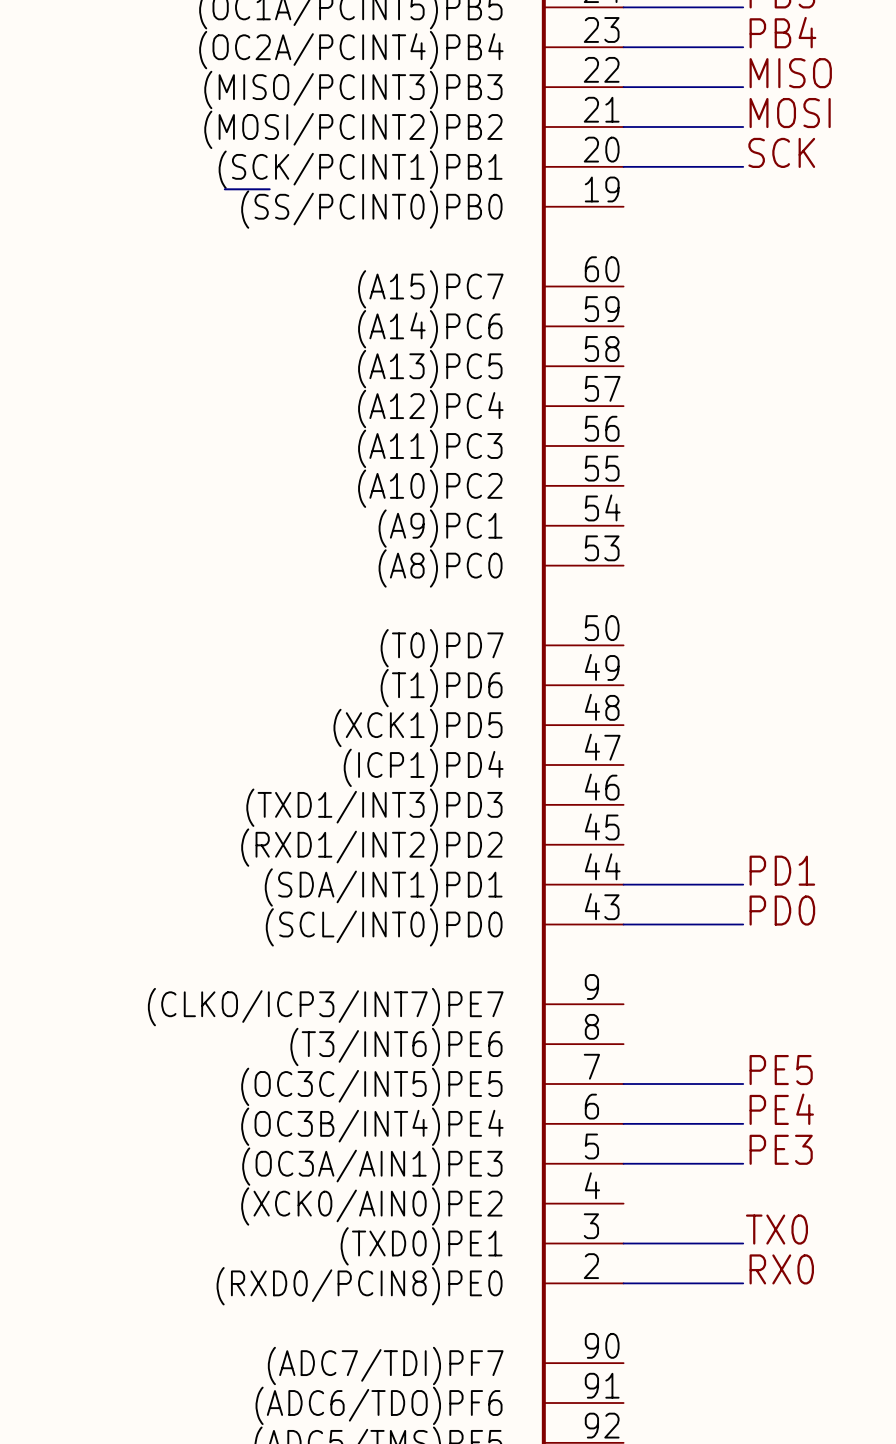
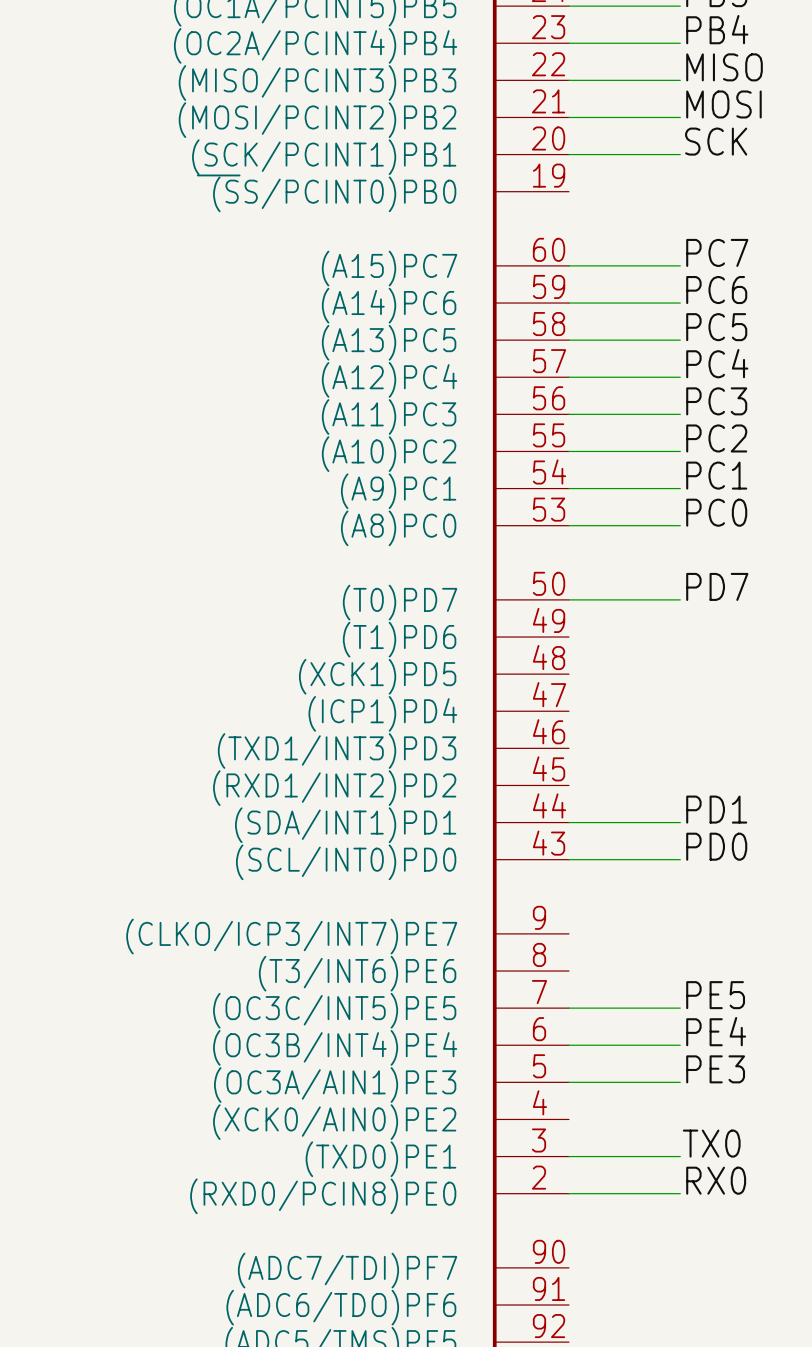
label: none -> PC7 (717, 252)
wire: none -> (568, 265) (680, 265)
label: none -> PC6 (716, 290)
wire: none -> (568, 303) (680, 303)
label: none -> PC5 (716, 327)
wire: none -> (568, 340) (680, 340)
label: none -> PC4 (717, 363)
wire: none -> (568, 377) (680, 377)
label: none -> PC3 (716, 401)
wire: none -> (568, 414) (680, 414)
label: none -> PC2 (716, 438)
wire: none -> (568, 451) (680, 451)
label: none -> PC1 (716, 475)
wire: none -> (568, 488) (680, 488)
label: none -> PC0 (716, 512)
wire: none -> (568, 525) (680, 525)
label: none -> PD7 (717, 586)
wire: none -> (568, 599) (680, 599)

